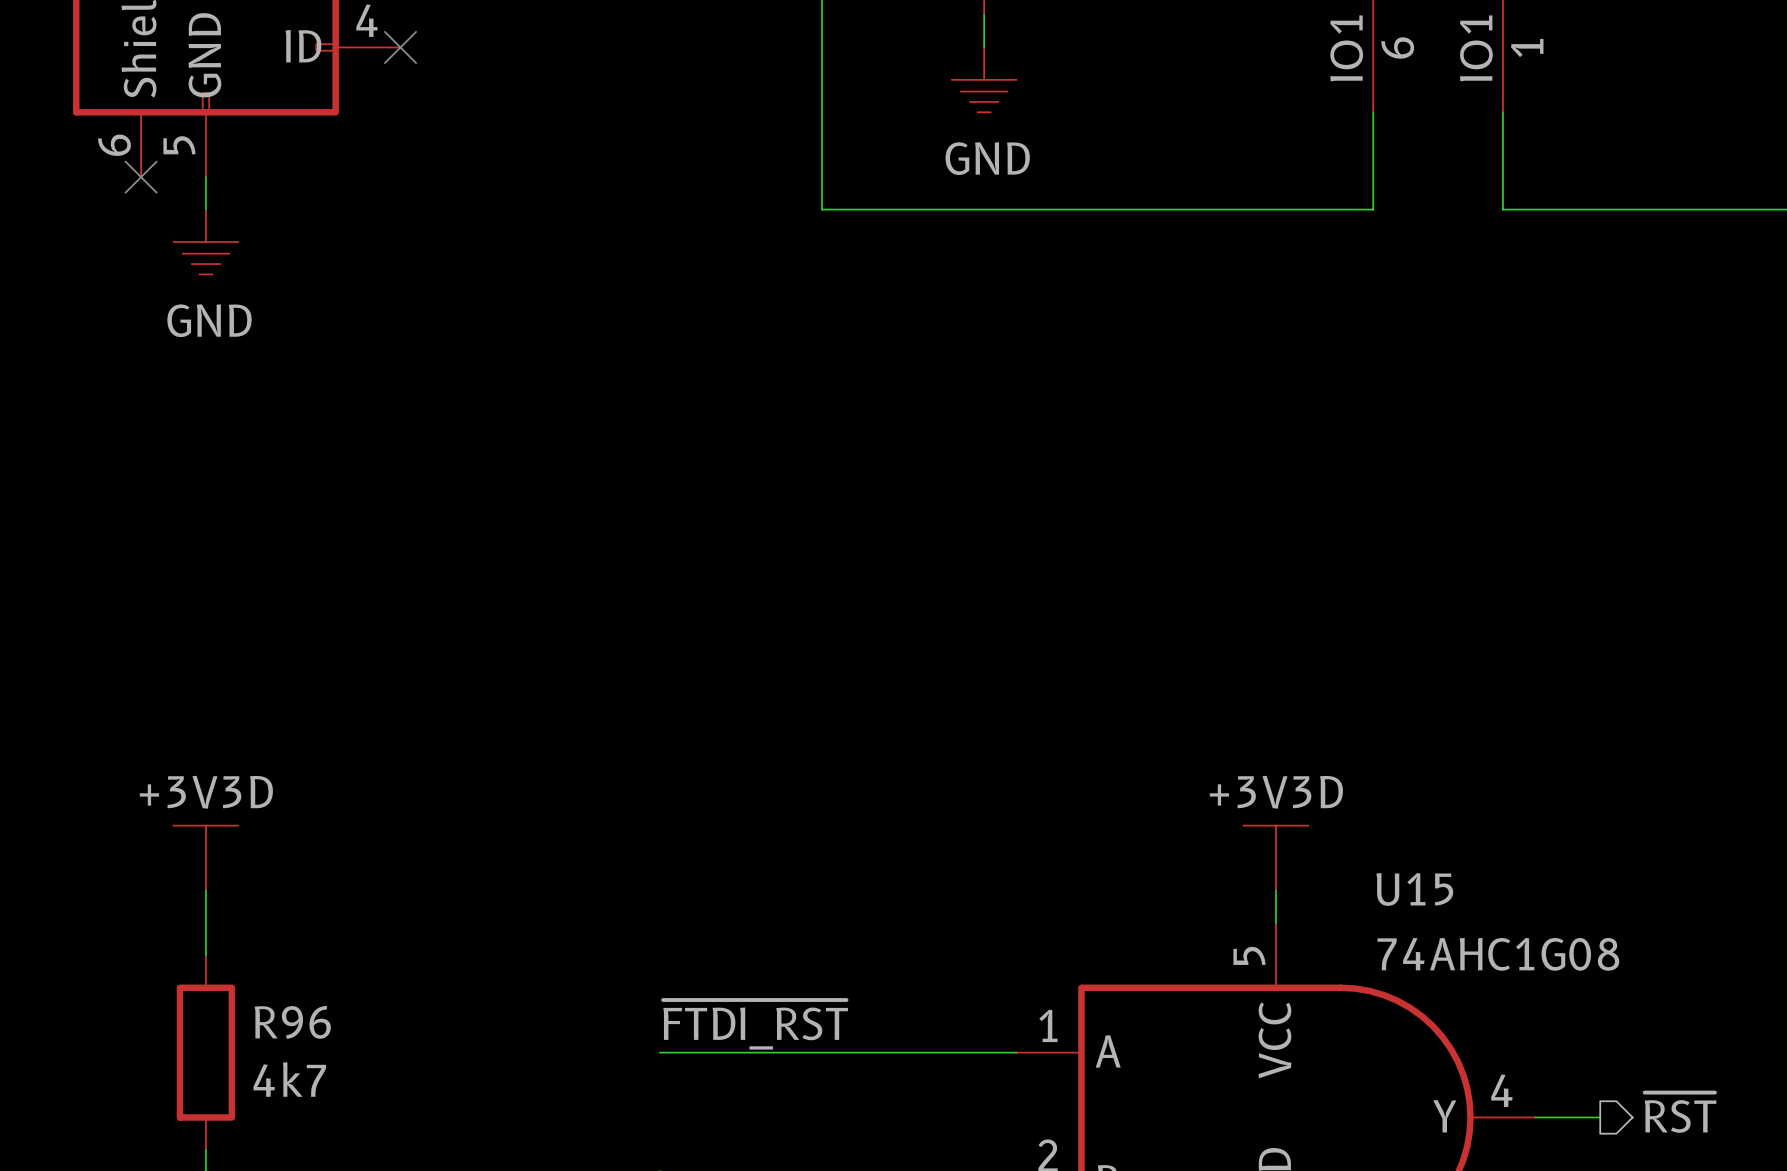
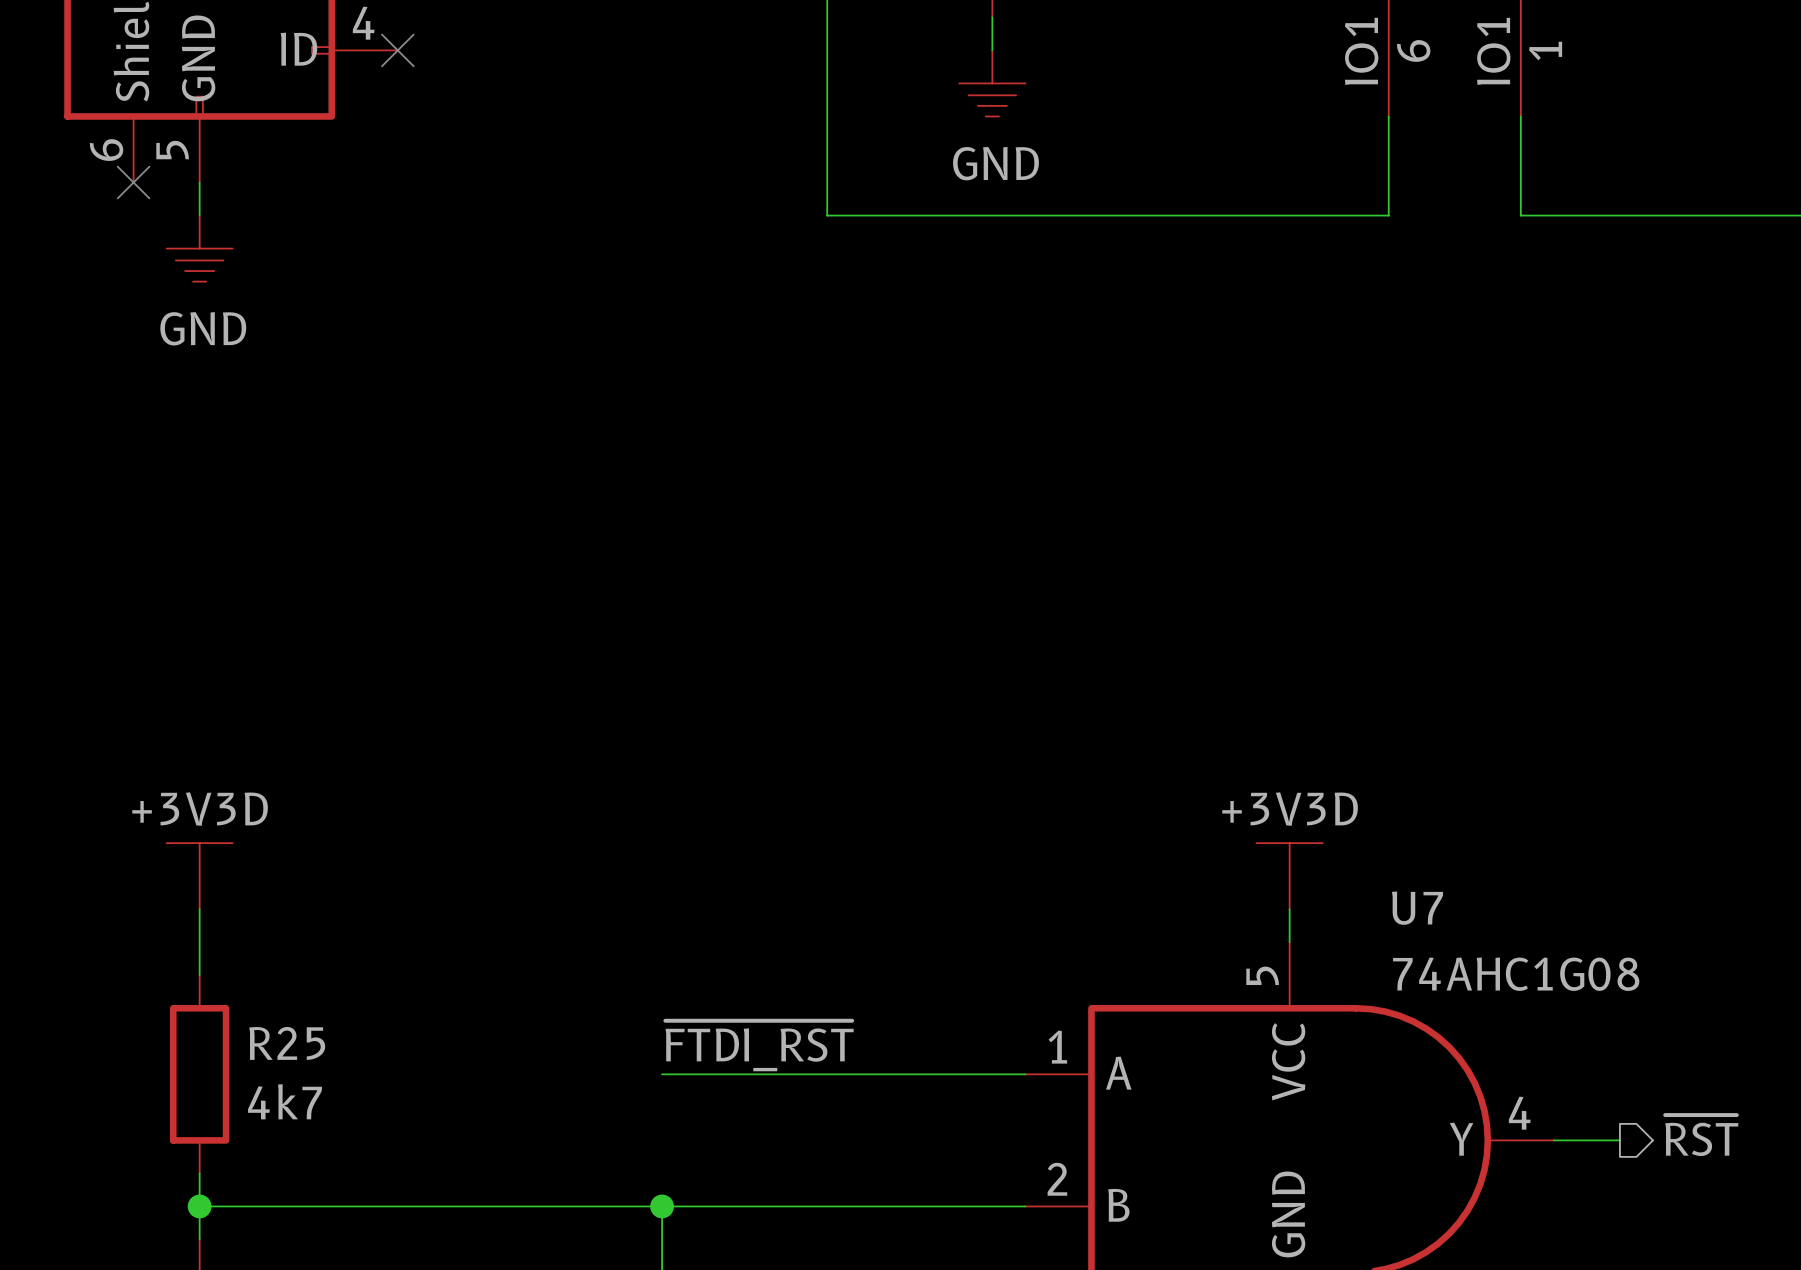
U15 name: U15 (1414, 889) -> U7 (1417, 908)
R96 name: R96 (292, 1022) -> R25 (287, 1043)

